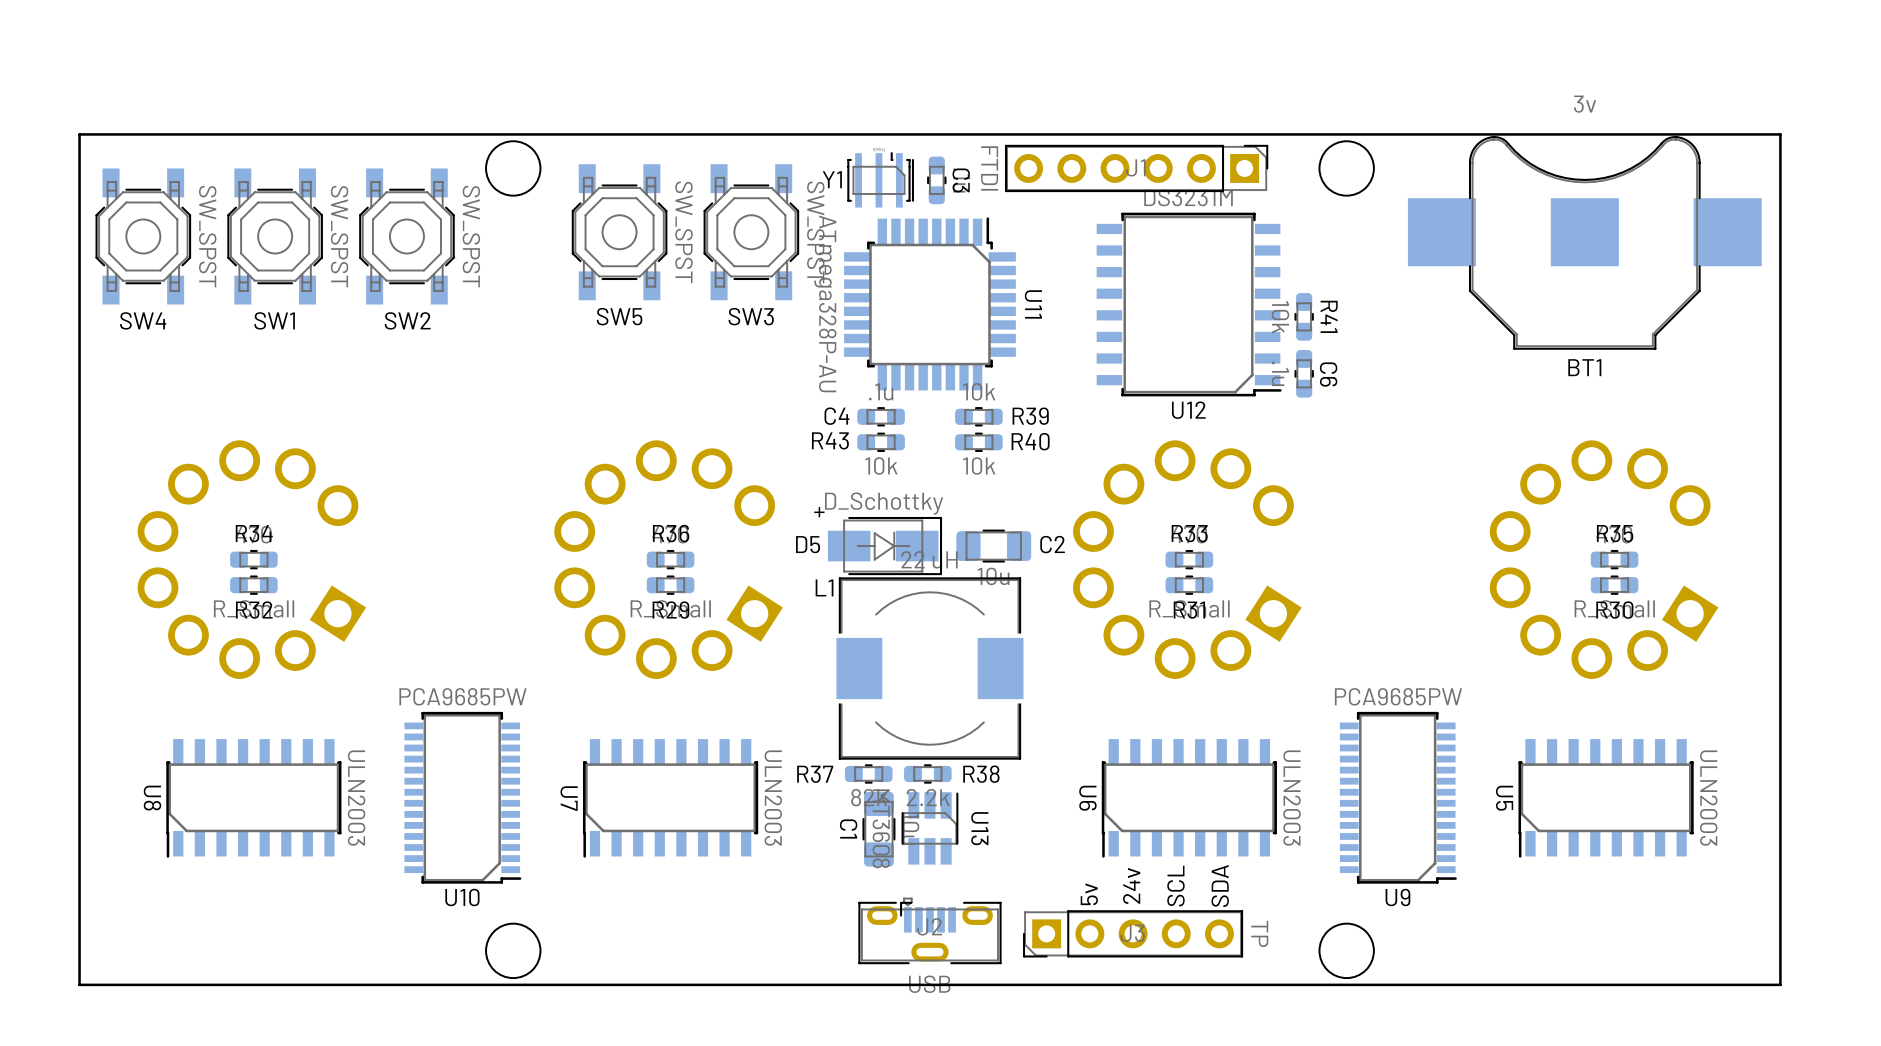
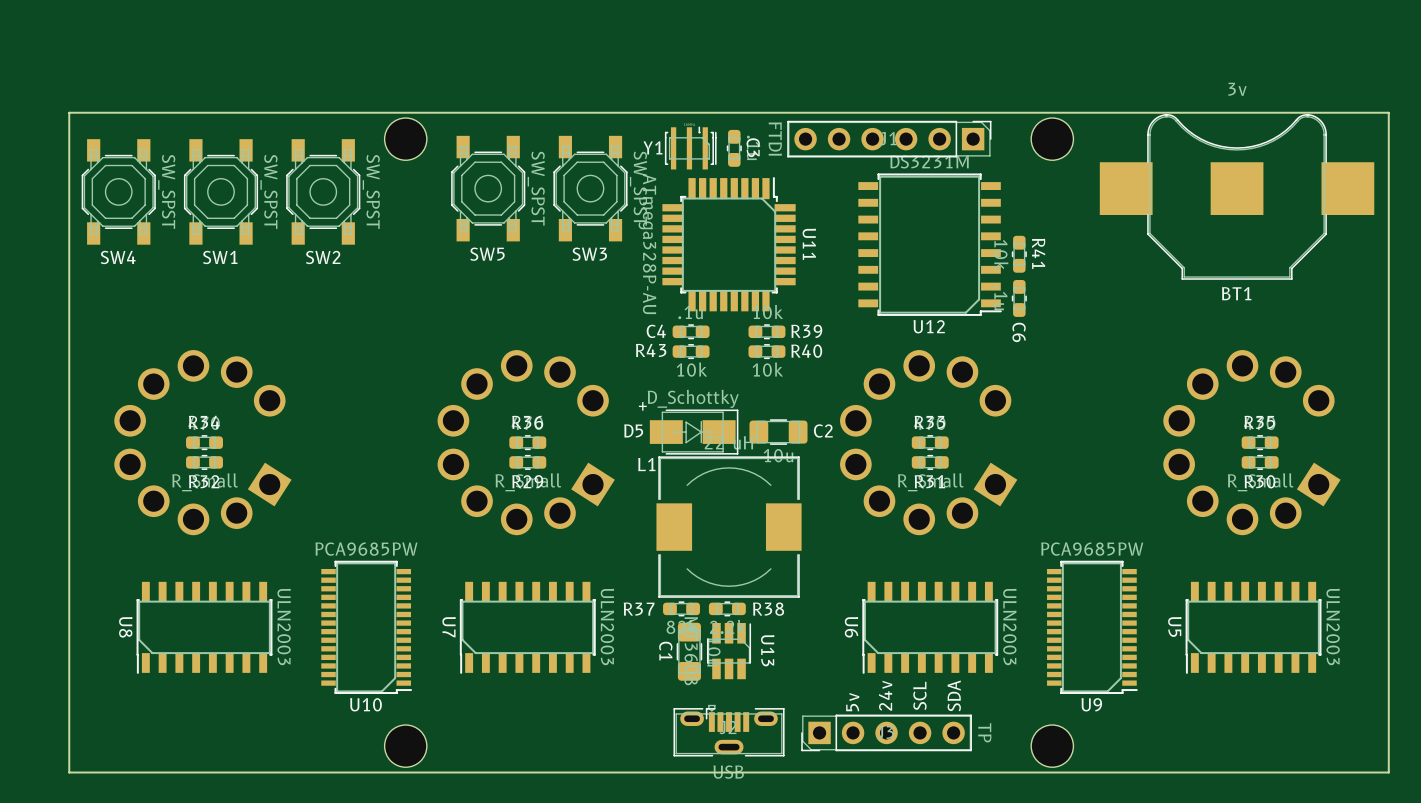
C6 name position: C6 (1328, 374) -> C6 (1019, 332)

